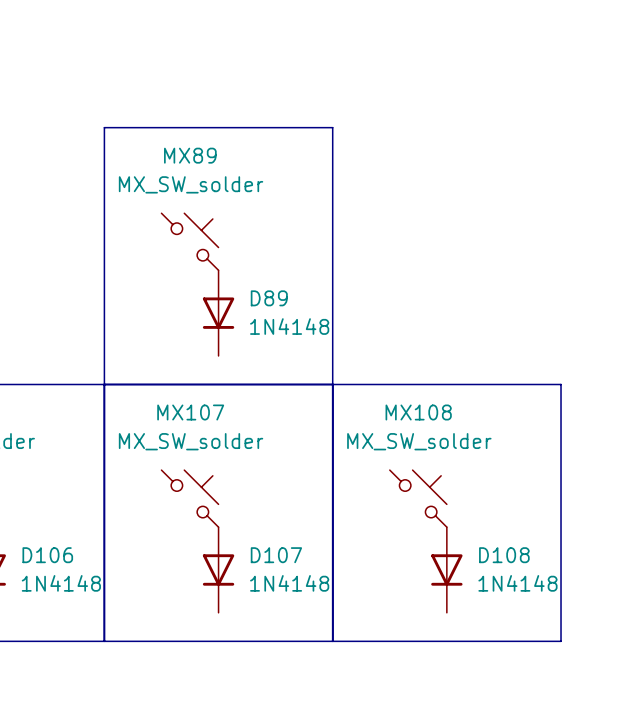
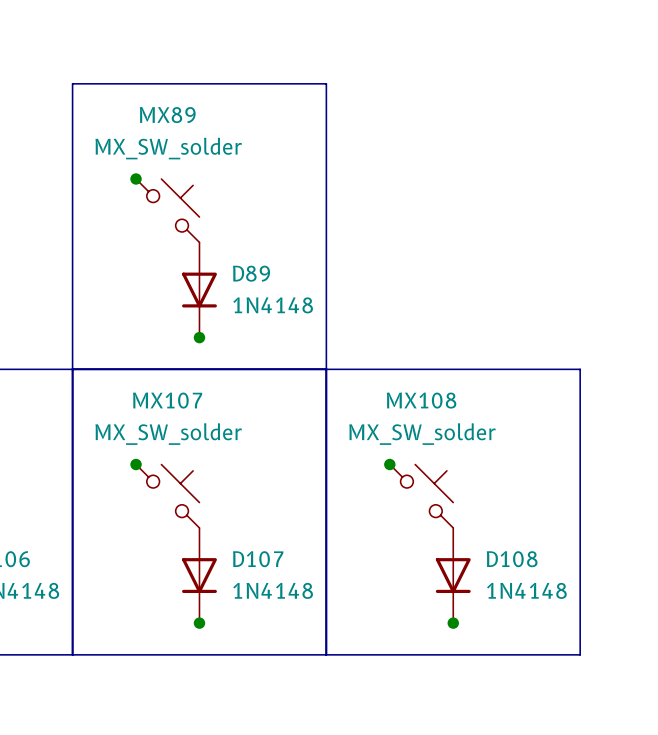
junction: none -> (136, 179)
junction: none -> (199, 337)
junction: none -> (136, 464)
junction: none -> (389, 464)
junction: none -> (199, 623)
junction: none -> (453, 623)

